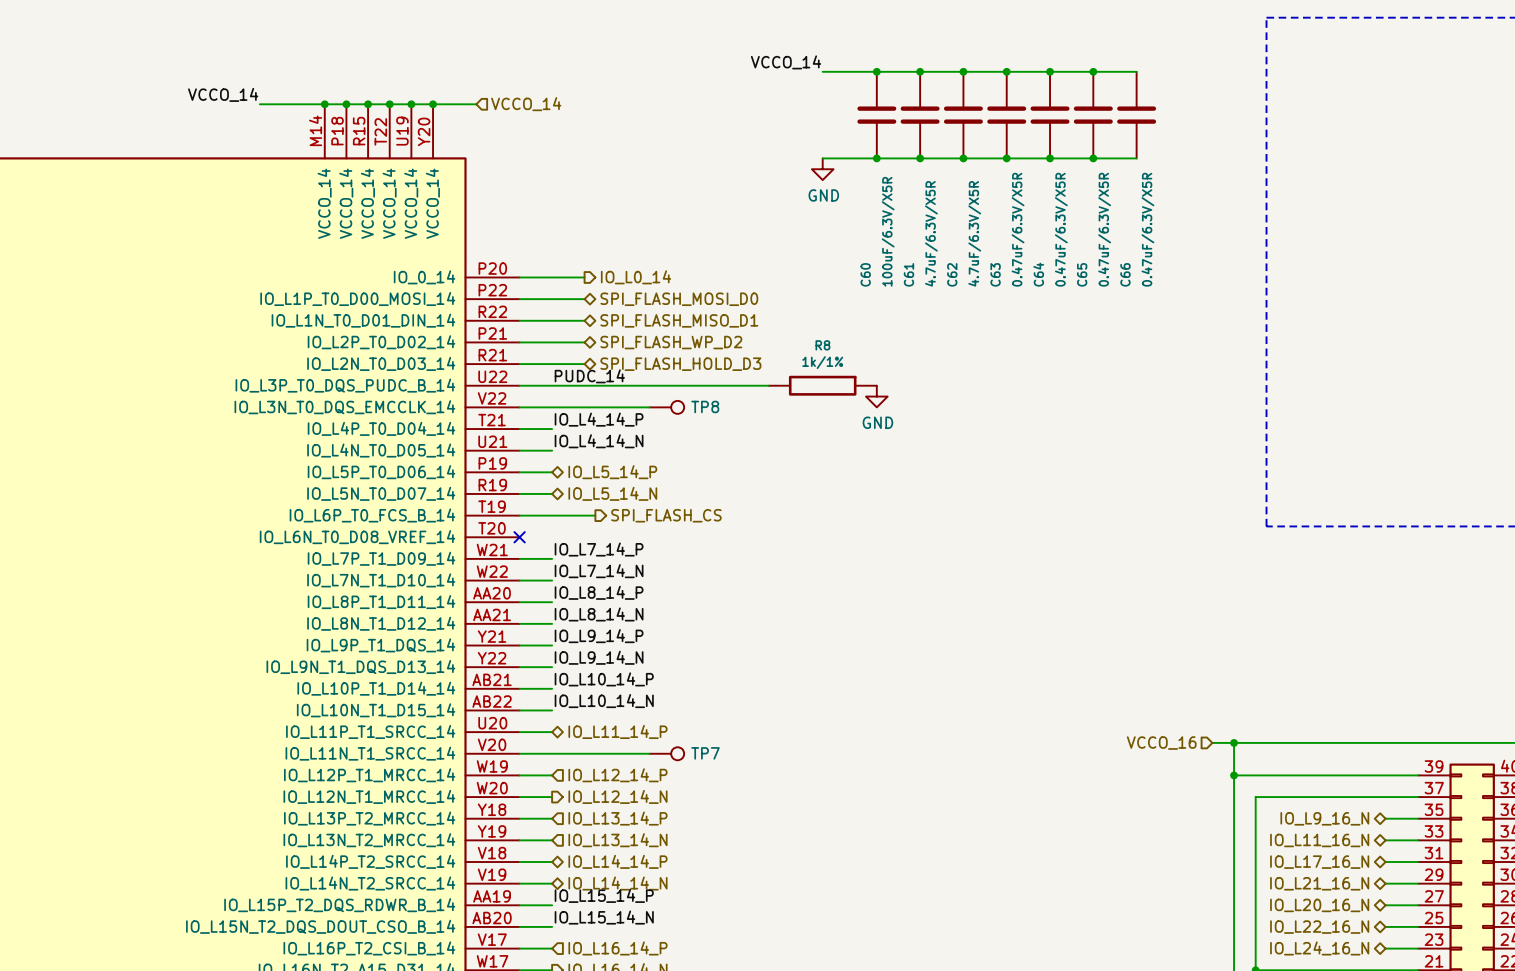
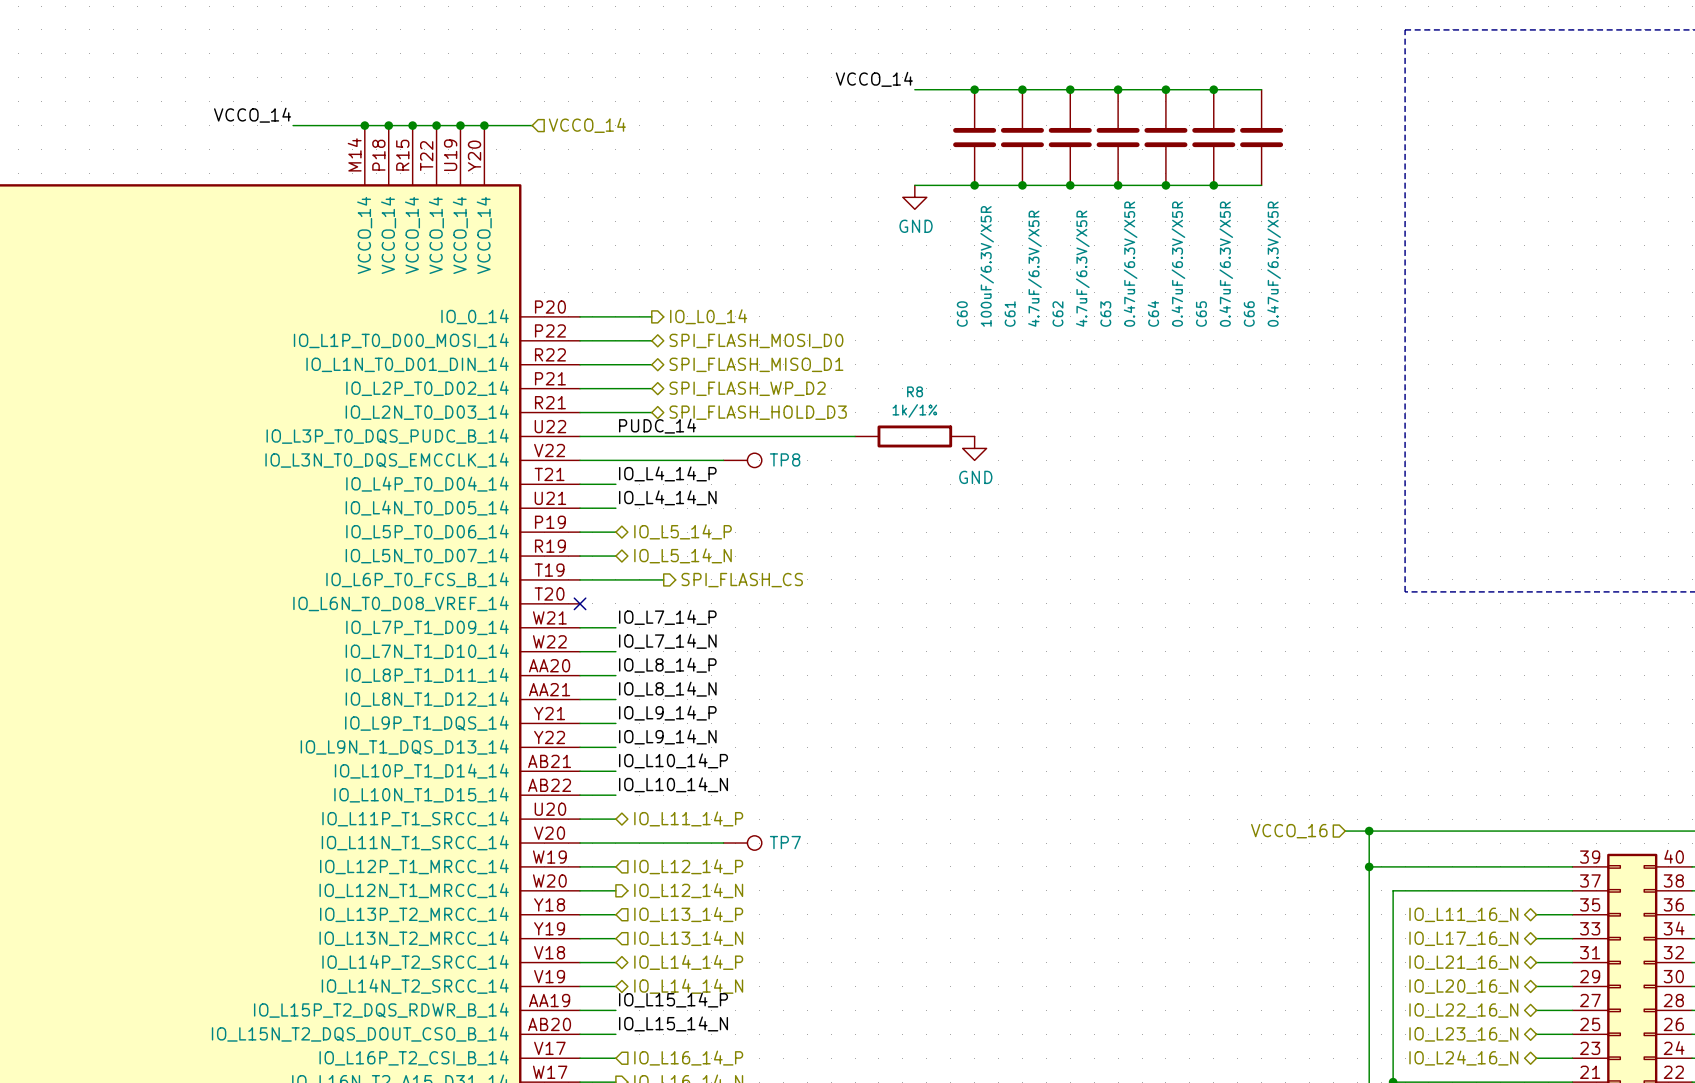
hierarchical label: IO_L9_16_N (1324, 818) -> IO_L11_16_N (1463, 914)
hierarchical label: IO_L11_16_N (1319, 840) -> IO_L17_16_N (1463, 938)
hierarchical label: IO_L17_16_N (1319, 862) -> IO_L21_16_N (1463, 962)
hierarchical label: IO_L21_16_N (1319, 883) -> IO_L20_16_N (1463, 986)
hierarchical label: IO_L20_16_N (1319, 905) -> IO_L22_16_N (1463, 1010)
hierarchical label: IO_L22_16_N (1319, 927) -> IO_L23_16_N (1463, 1034)

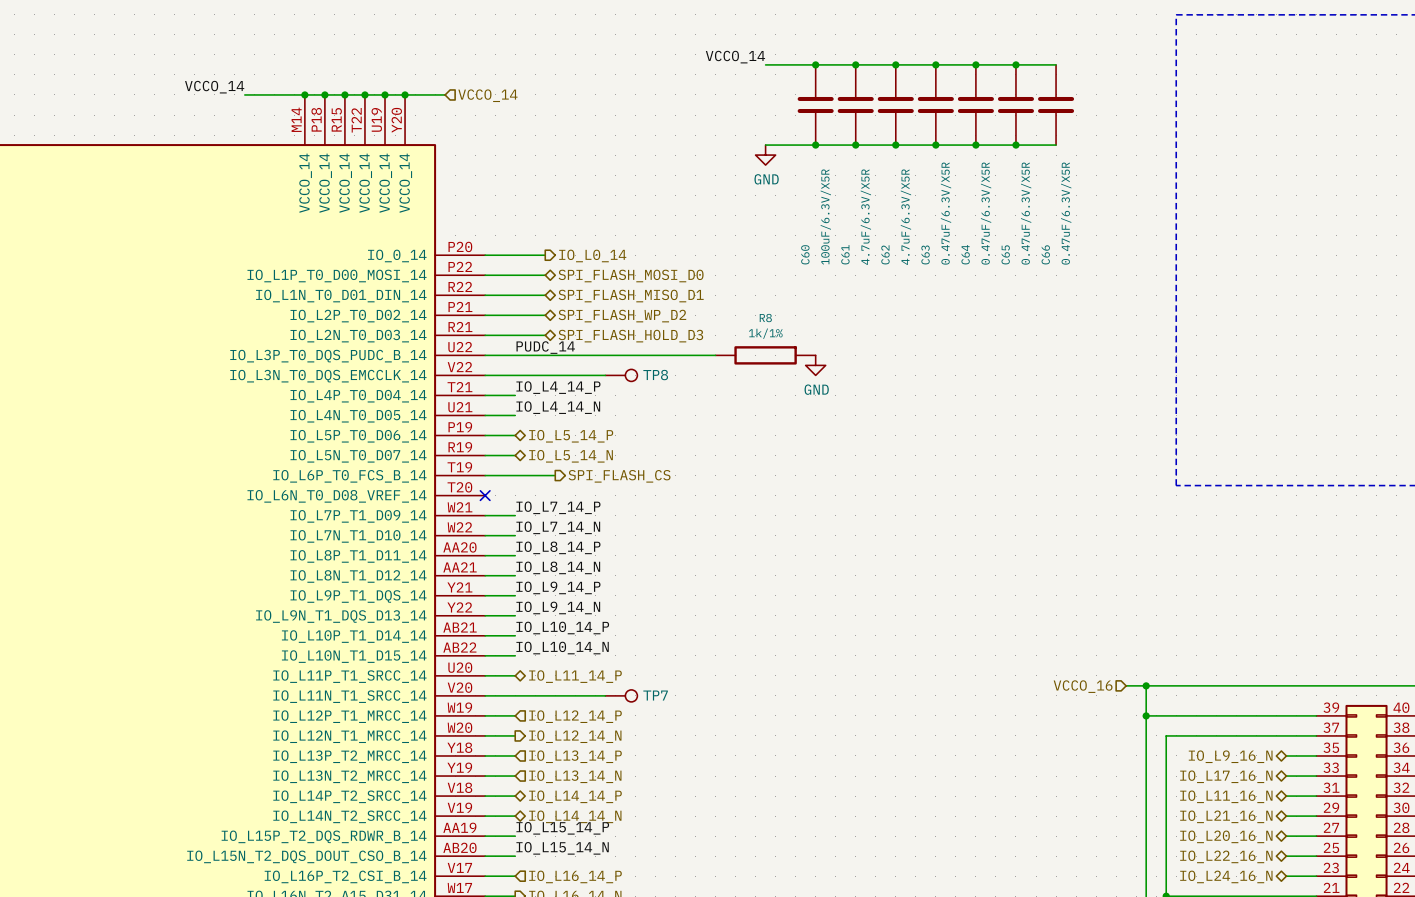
hierarchical label: IO_L11_16_N (1463, 914) -> IO_L9_16_N (1230, 756)
hierarchical label: IO_L21_16_N (1463, 962) -> IO_L11_16_N (1226, 796)
hierarchical label: IO_L20_16_N (1463, 986) -> IO_L21_16_N (1226, 816)
hierarchical label: IO_L22_16_N (1463, 1010) -> IO_L20_16_N (1226, 836)
hierarchical label: IO_L23_16_N (1463, 1034) -> IO_L22_16_N (1226, 856)

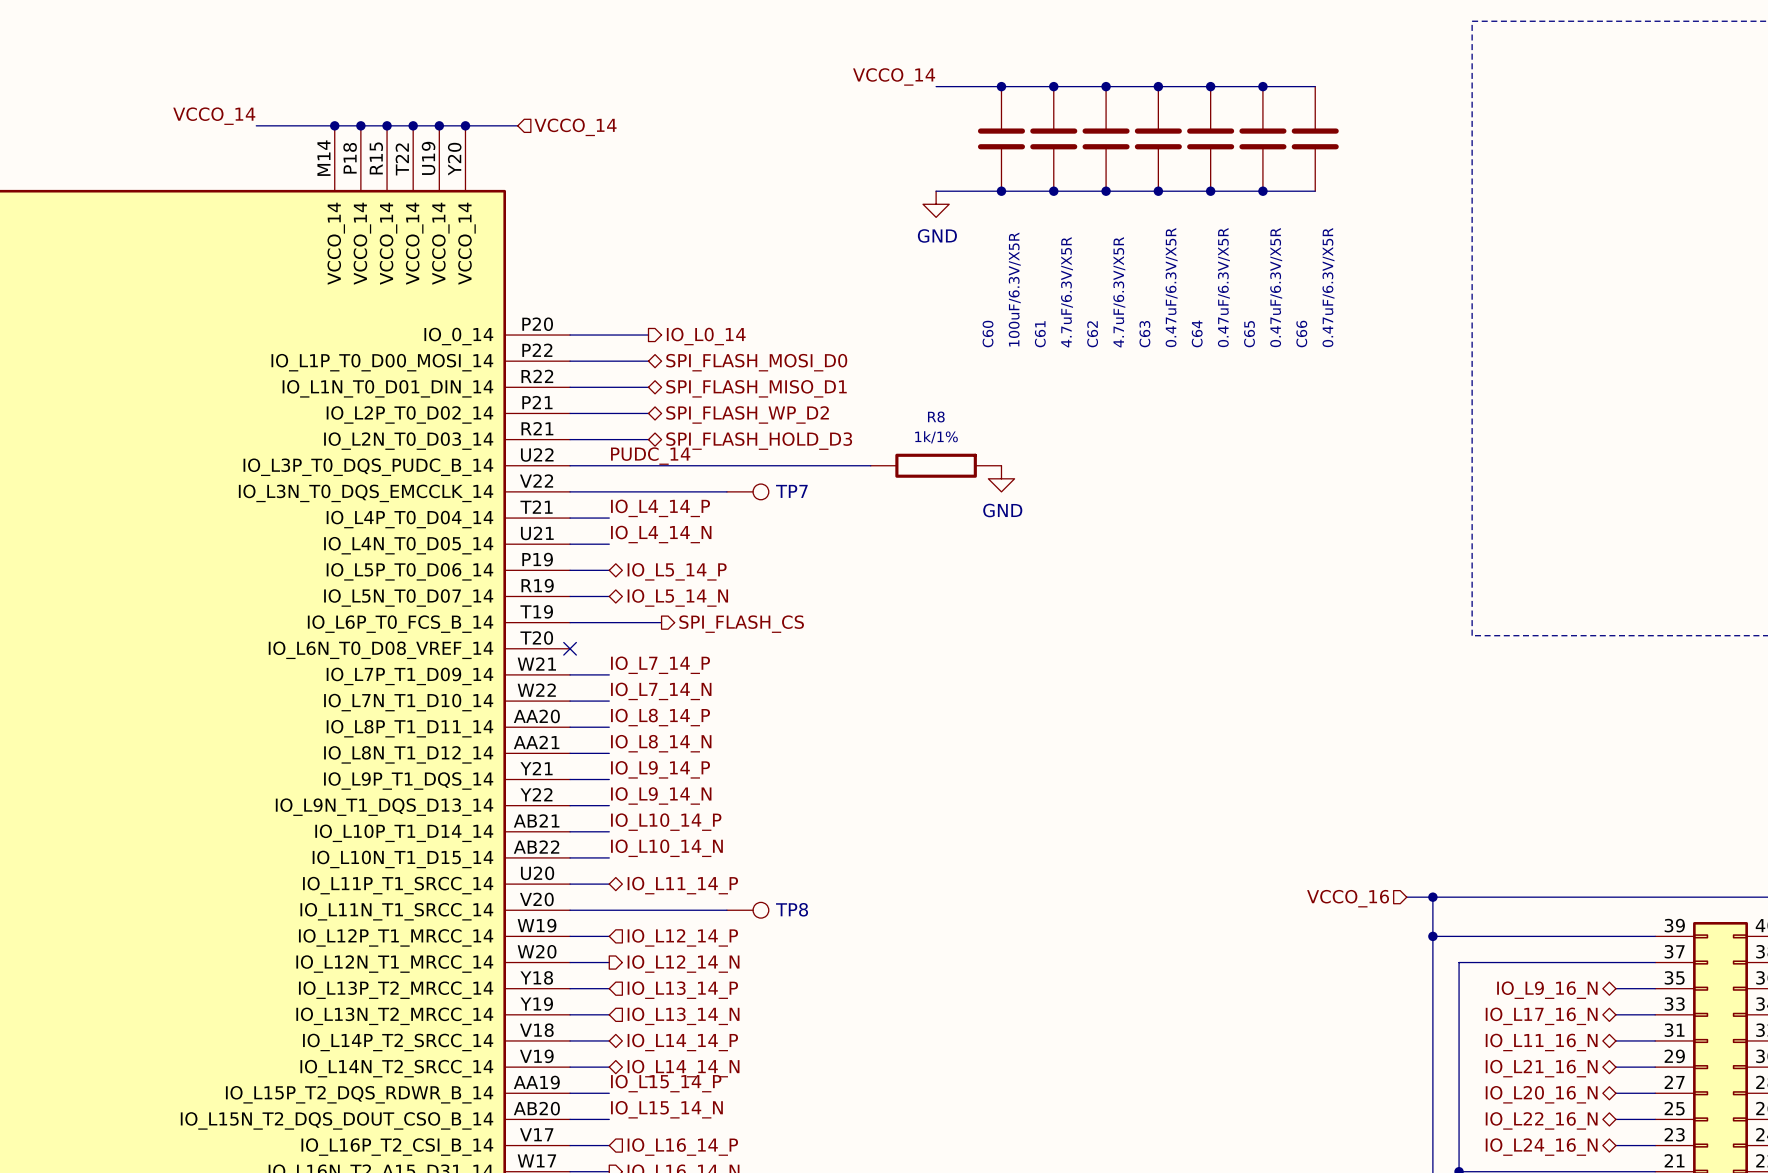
TP8 name: TP8 (655, 375) -> TP7 (791, 491)
TP7 name: TP7 (655, 695) -> TP8 (792, 909)

